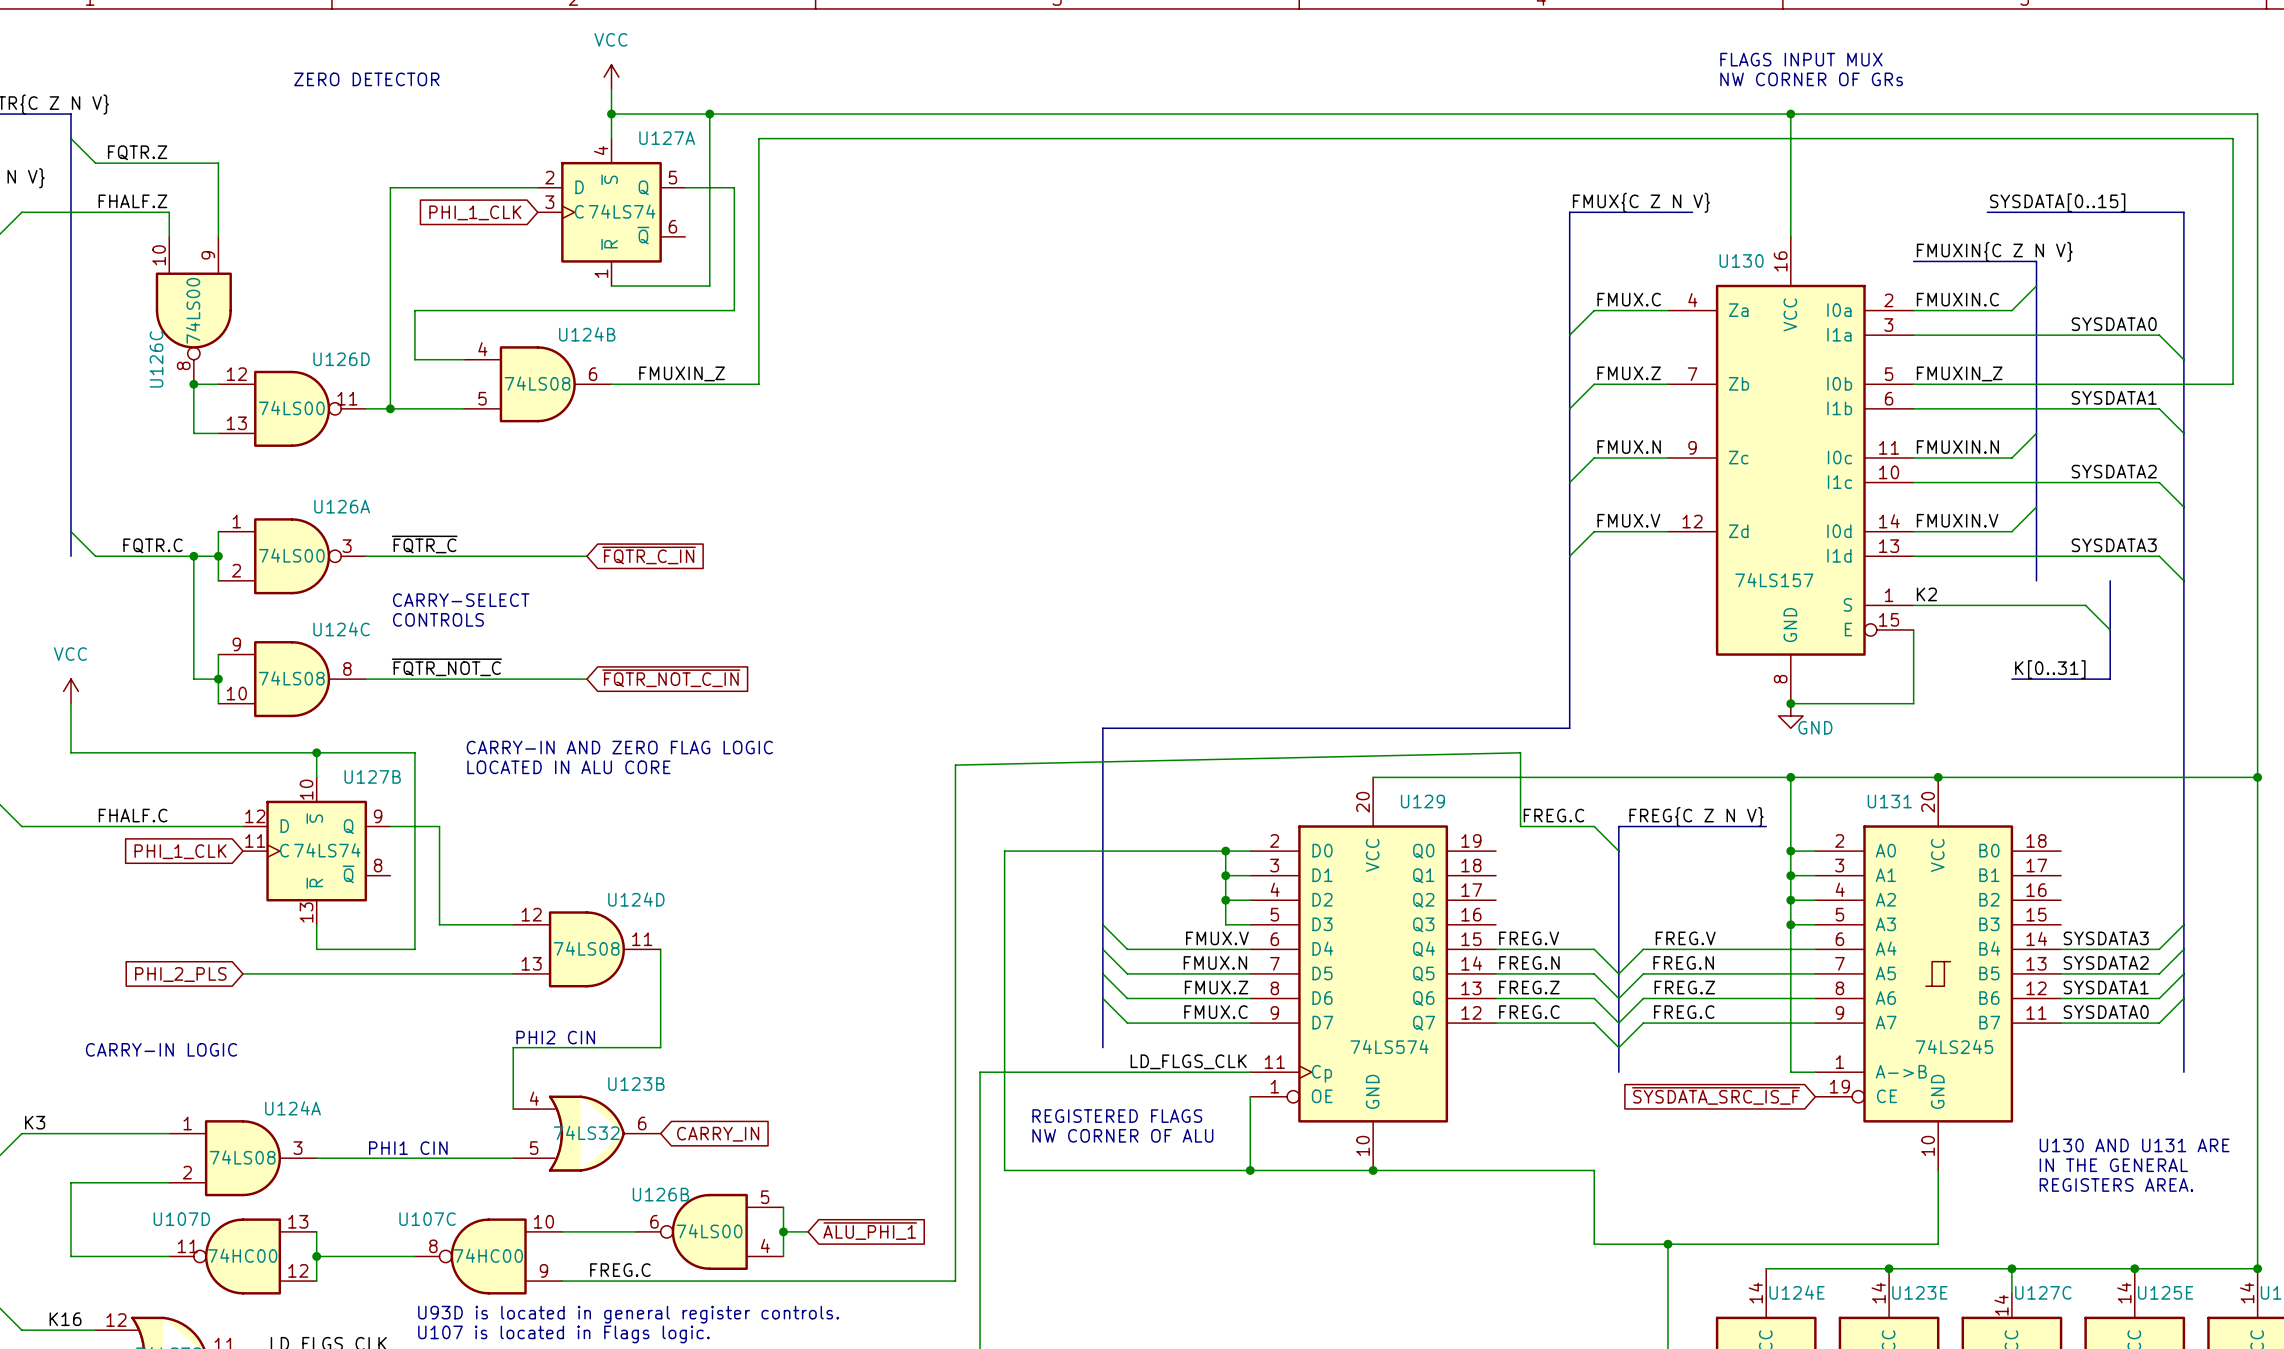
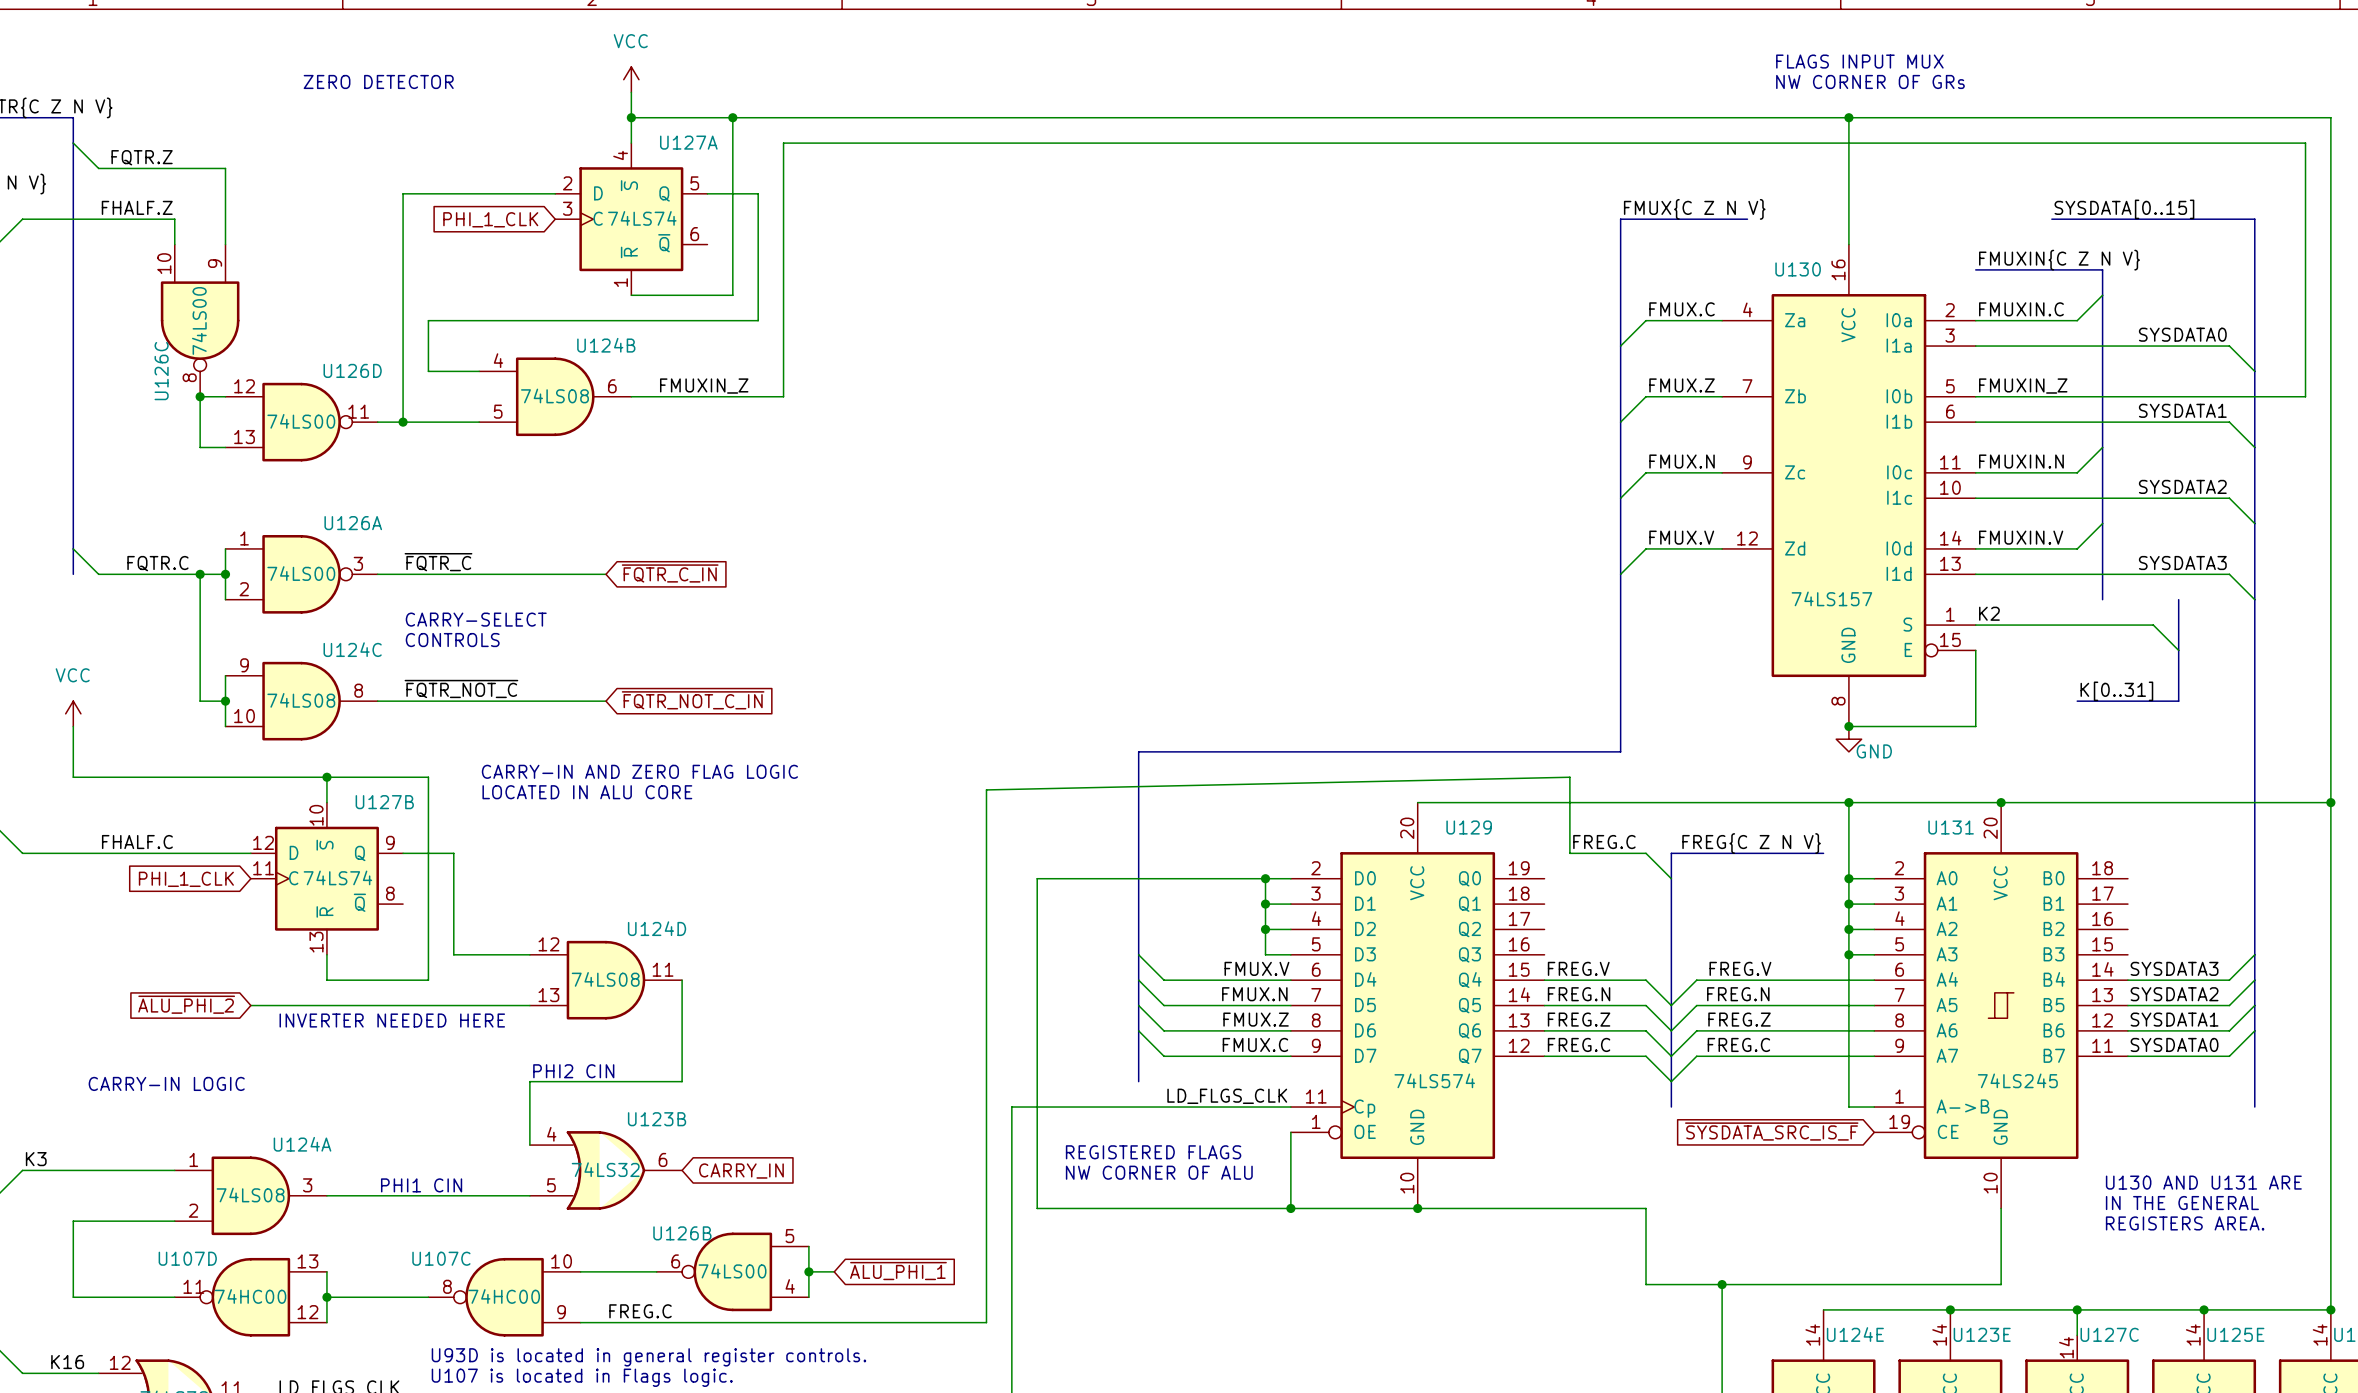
global label: PHI_2_PLS (180, 974) -> ~{ALU_PHI_2} (186, 1004)
text: none -> INVERTER NEEDED HERE (392, 1020)

